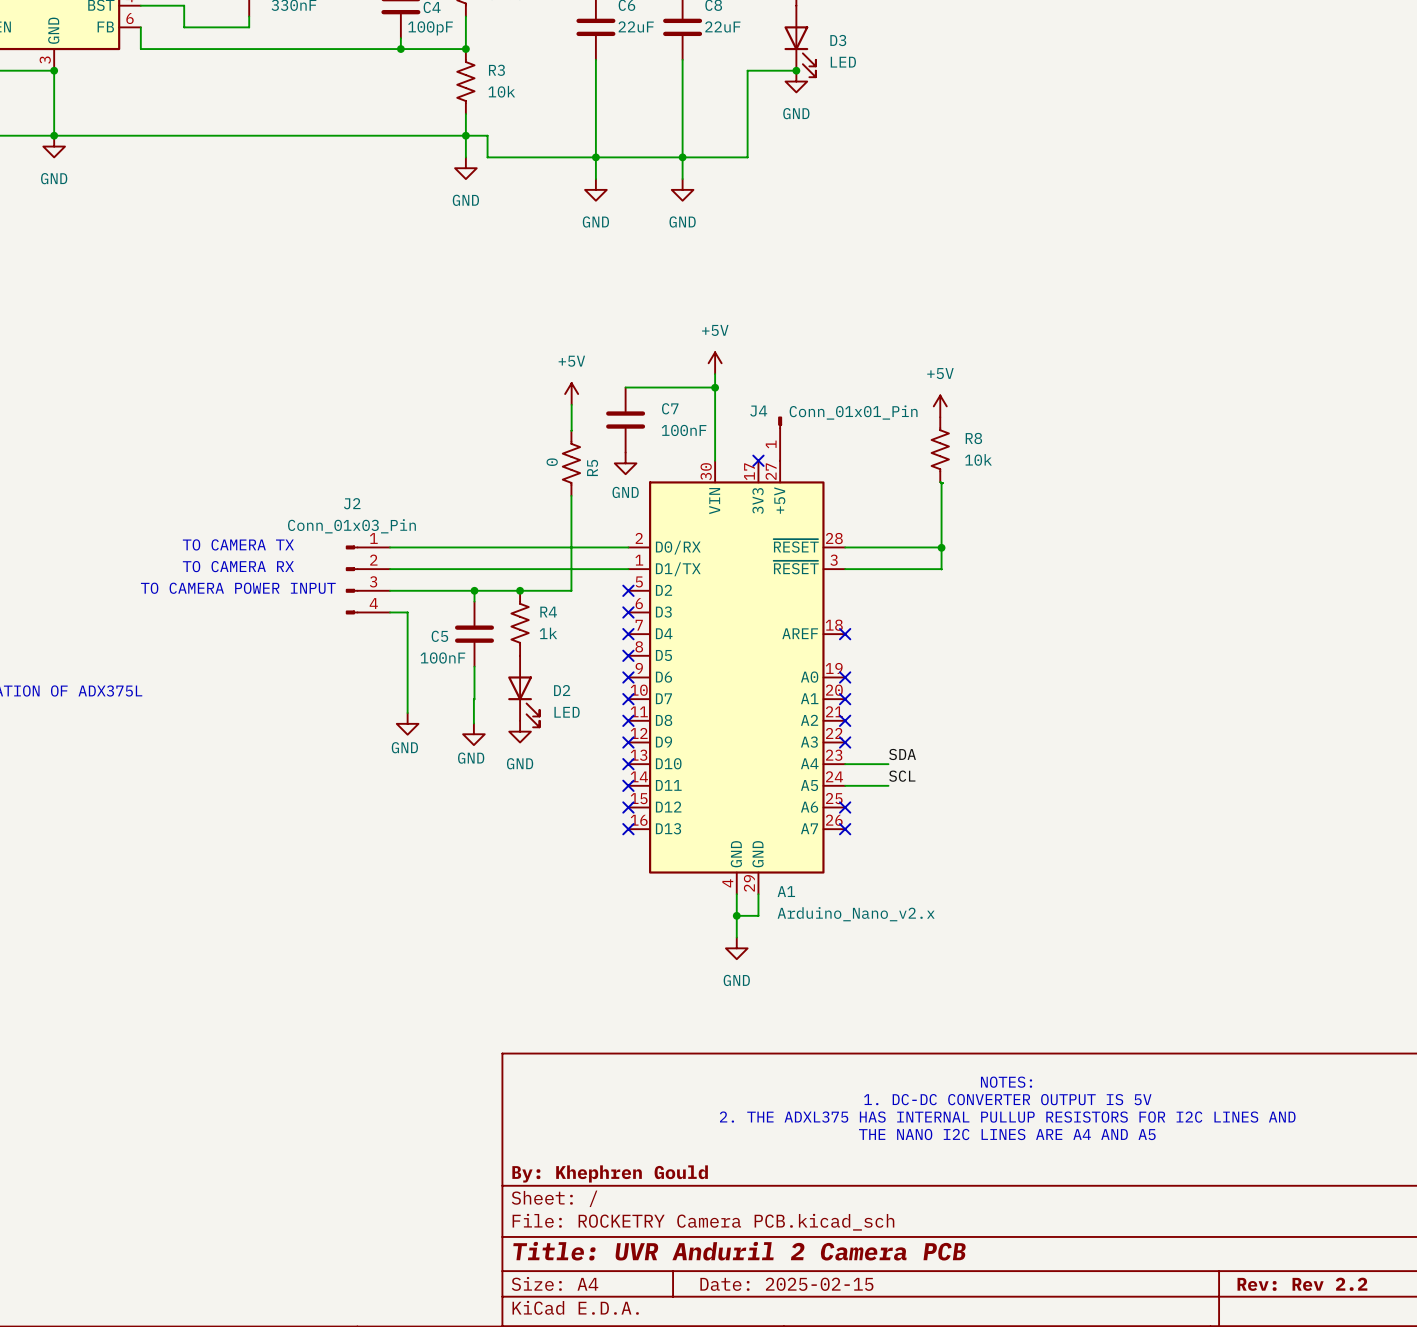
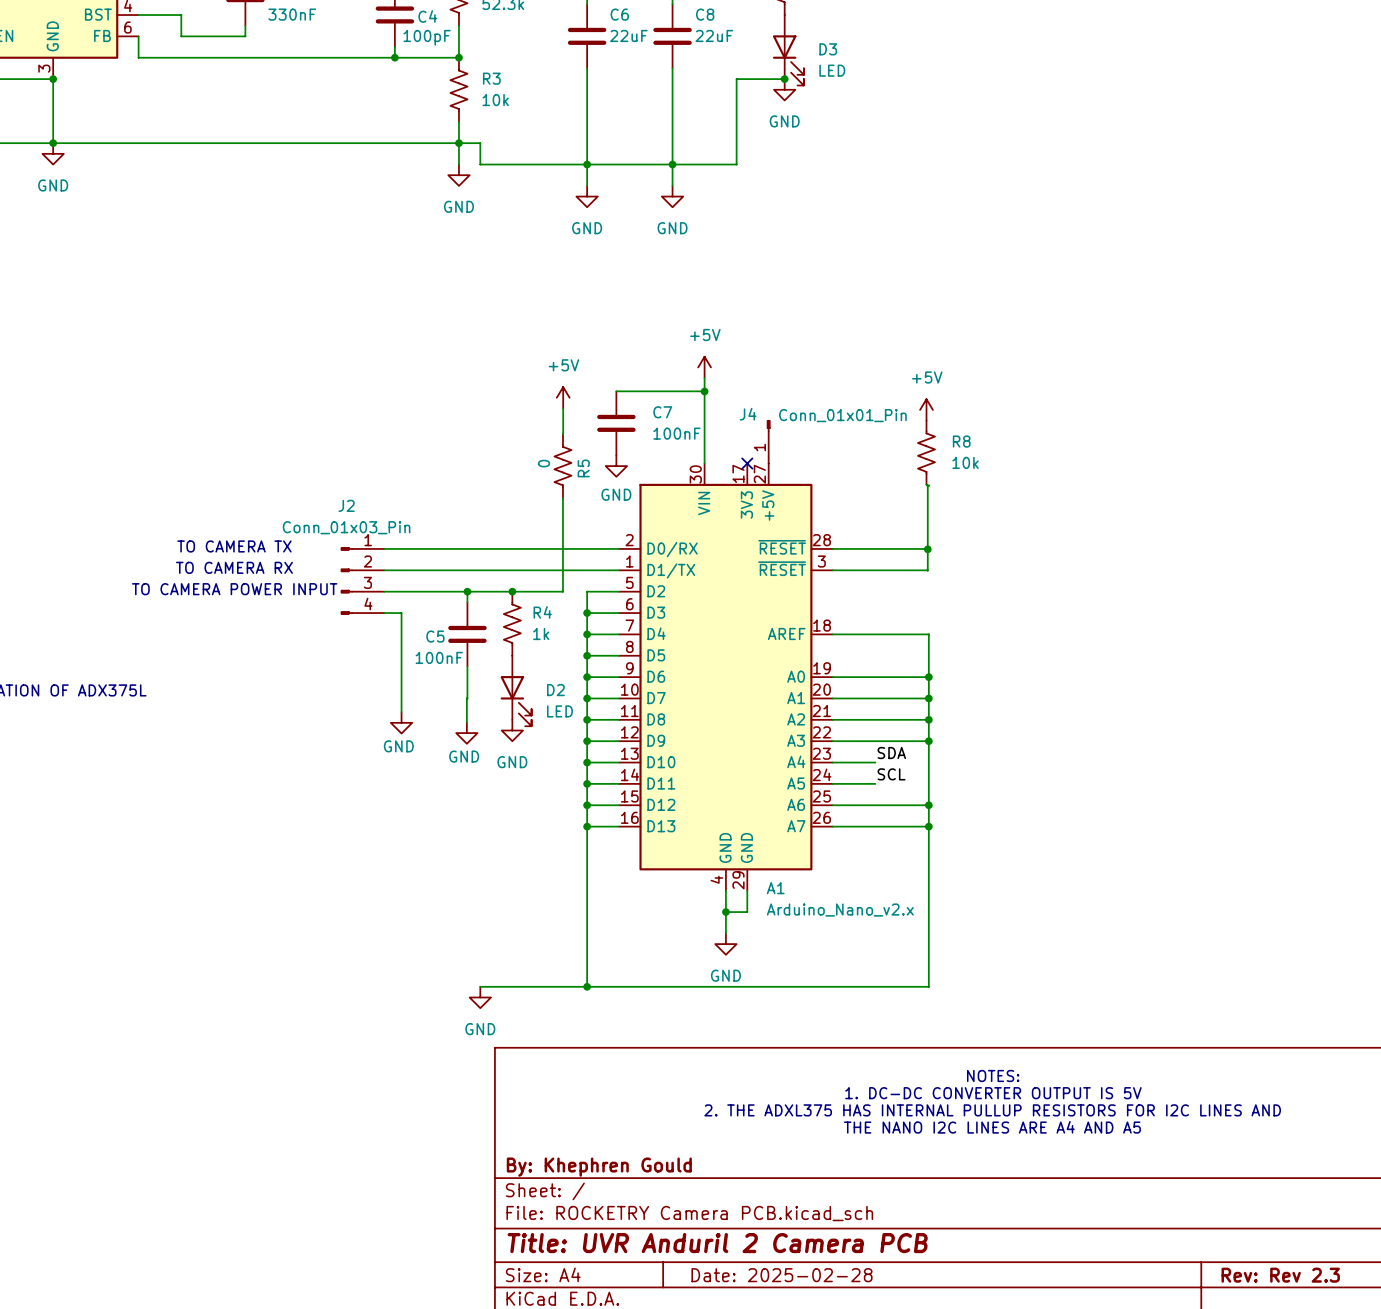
wire: none -> (619, 591) (587, 591) (587, 986)
no-connect mark: (628, 590) -> none
wire: none -> (587, 613) (619, 613)
junction: none -> (587, 613)
no-connect mark: (628, 612) -> none
wire: none -> (587, 634) (619, 634)
junction: none -> (587, 634)
no-connect mark: (628, 634) -> none
wire: none -> (832, 634) (928, 634) (928, 986) (480, 986)
no-connect mark: (845, 634) -> none
wire: none -> (587, 655) (619, 655)
junction: none -> (587, 655)
no-connect mark: (628, 655) -> none
wire: none -> (587, 677) (619, 677)
junction: none -> (587, 677)
no-connect mark: (628, 677) -> none
wire: none -> (832, 677) (928, 677)
no-connect mark: (845, 677) -> none
junction: none -> (928, 677)
wire: none -> (587, 698) (619, 698)
junction: none -> (587, 698)
no-connect mark: (628, 699) -> none
wire: none -> (832, 698) (928, 698)
no-connect mark: (845, 699) -> none
junction: none -> (928, 698)
wire: none -> (587, 719) (619, 719)
junction: none -> (587, 719)
no-connect mark: (628, 720) -> none
wire: none -> (832, 719) (928, 719)
no-connect mark: (845, 720) -> none
junction: none -> (928, 719)
wire: none -> (587, 741) (619, 741)
junction: none -> (587, 741)
no-connect mark: (628, 742) -> none
wire: none -> (832, 741) (928, 741)
no-connect mark: (845, 742) -> none
junction: none -> (928, 741)
wire: none -> (587, 762) (619, 762)
junction: none -> (587, 762)
no-connect mark: (628, 764) -> none
wire: none -> (587, 783) (619, 783)
junction: none -> (587, 783)
no-connect mark: (628, 785) -> none
wire: none -> (587, 805) (619, 805)
junction: none -> (587, 805)
no-connect mark: (628, 807) -> none
wire: none -> (832, 805) (928, 805)
no-connect mark: (845, 807) -> none
junction: none -> (928, 805)
wire: none -> (587, 826) (619, 826)
junction: none -> (587, 826)
no-connect mark: (628, 829) -> none
wire: none -> (832, 826) (928, 826)
no-connect mark: (845, 829) -> none
junction: none -> (928, 826)
junction: none -> (587, 986)
power symbol: none -> GND (480, 997)
title block: Date: 2025-02-15 (786, 1284) -> Date: 2025-02-28 (781, 1275)
title block: Rev: Rev 2.2 (1302, 1284) -> Rev: Rev 2.3 (1280, 1275)

